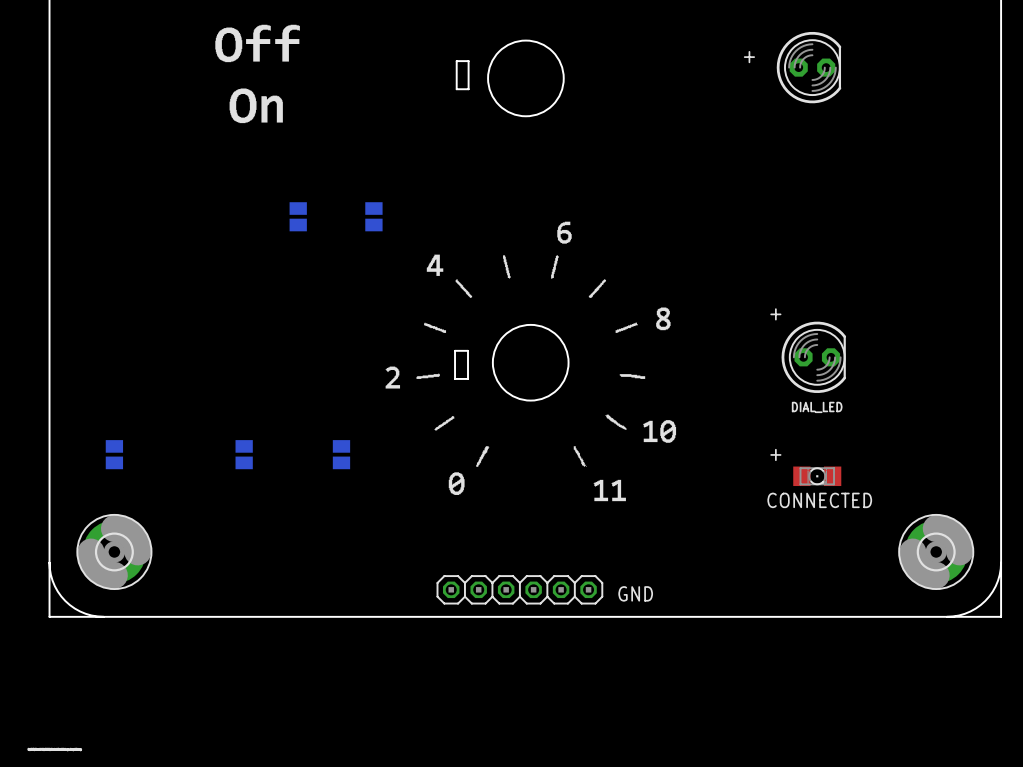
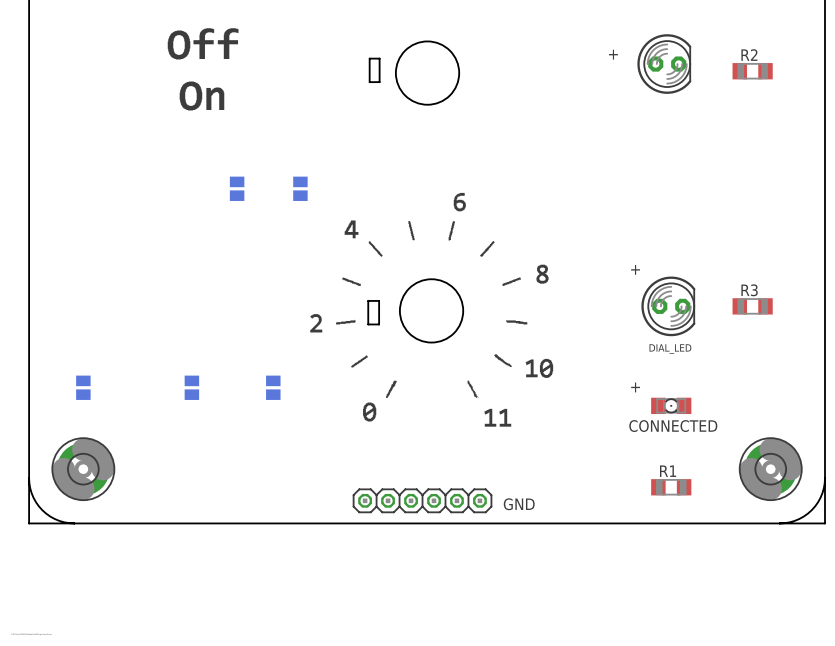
R2: none -> (752, 71)
R3: none -> (752, 306)
R1: none -> (671, 487)

